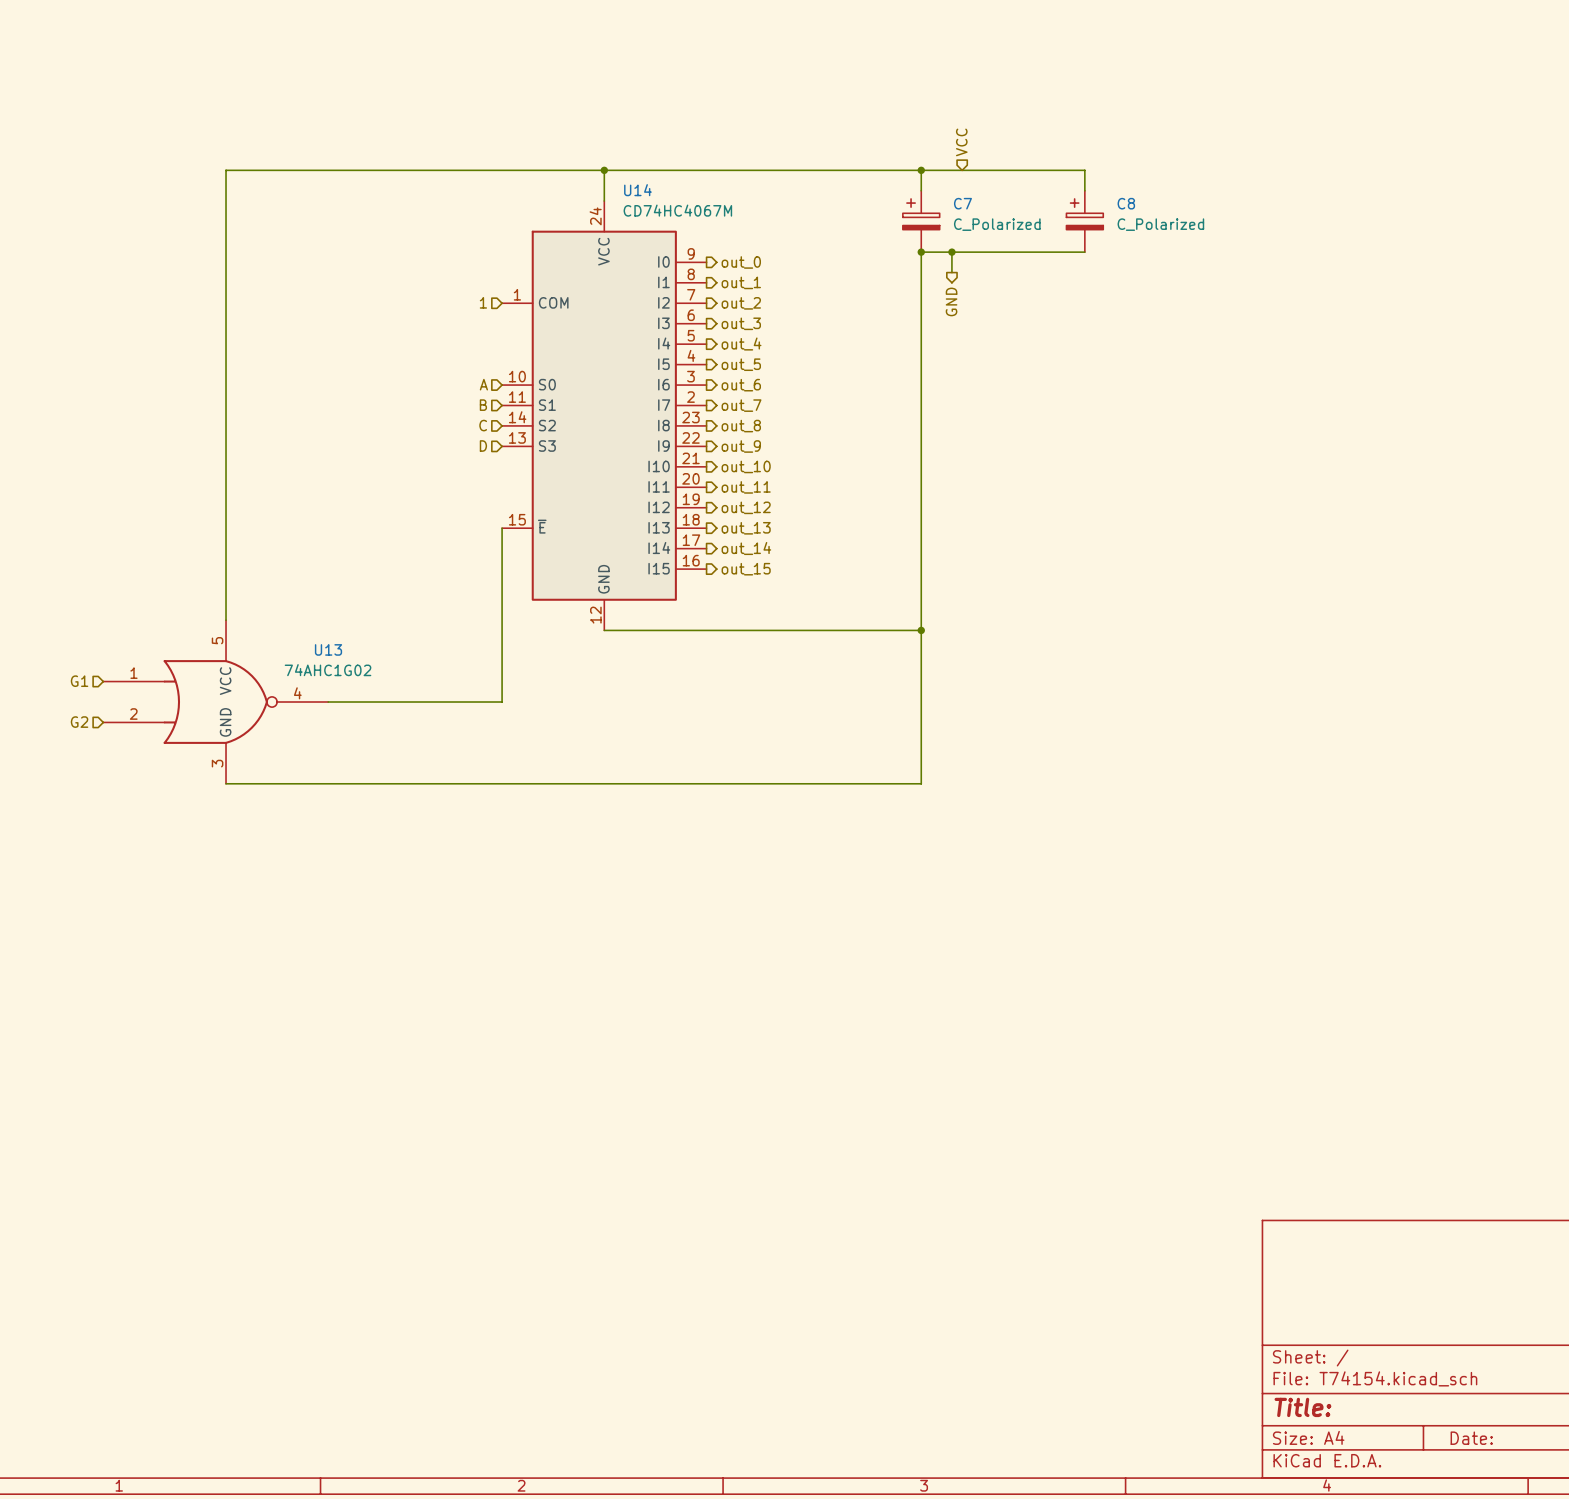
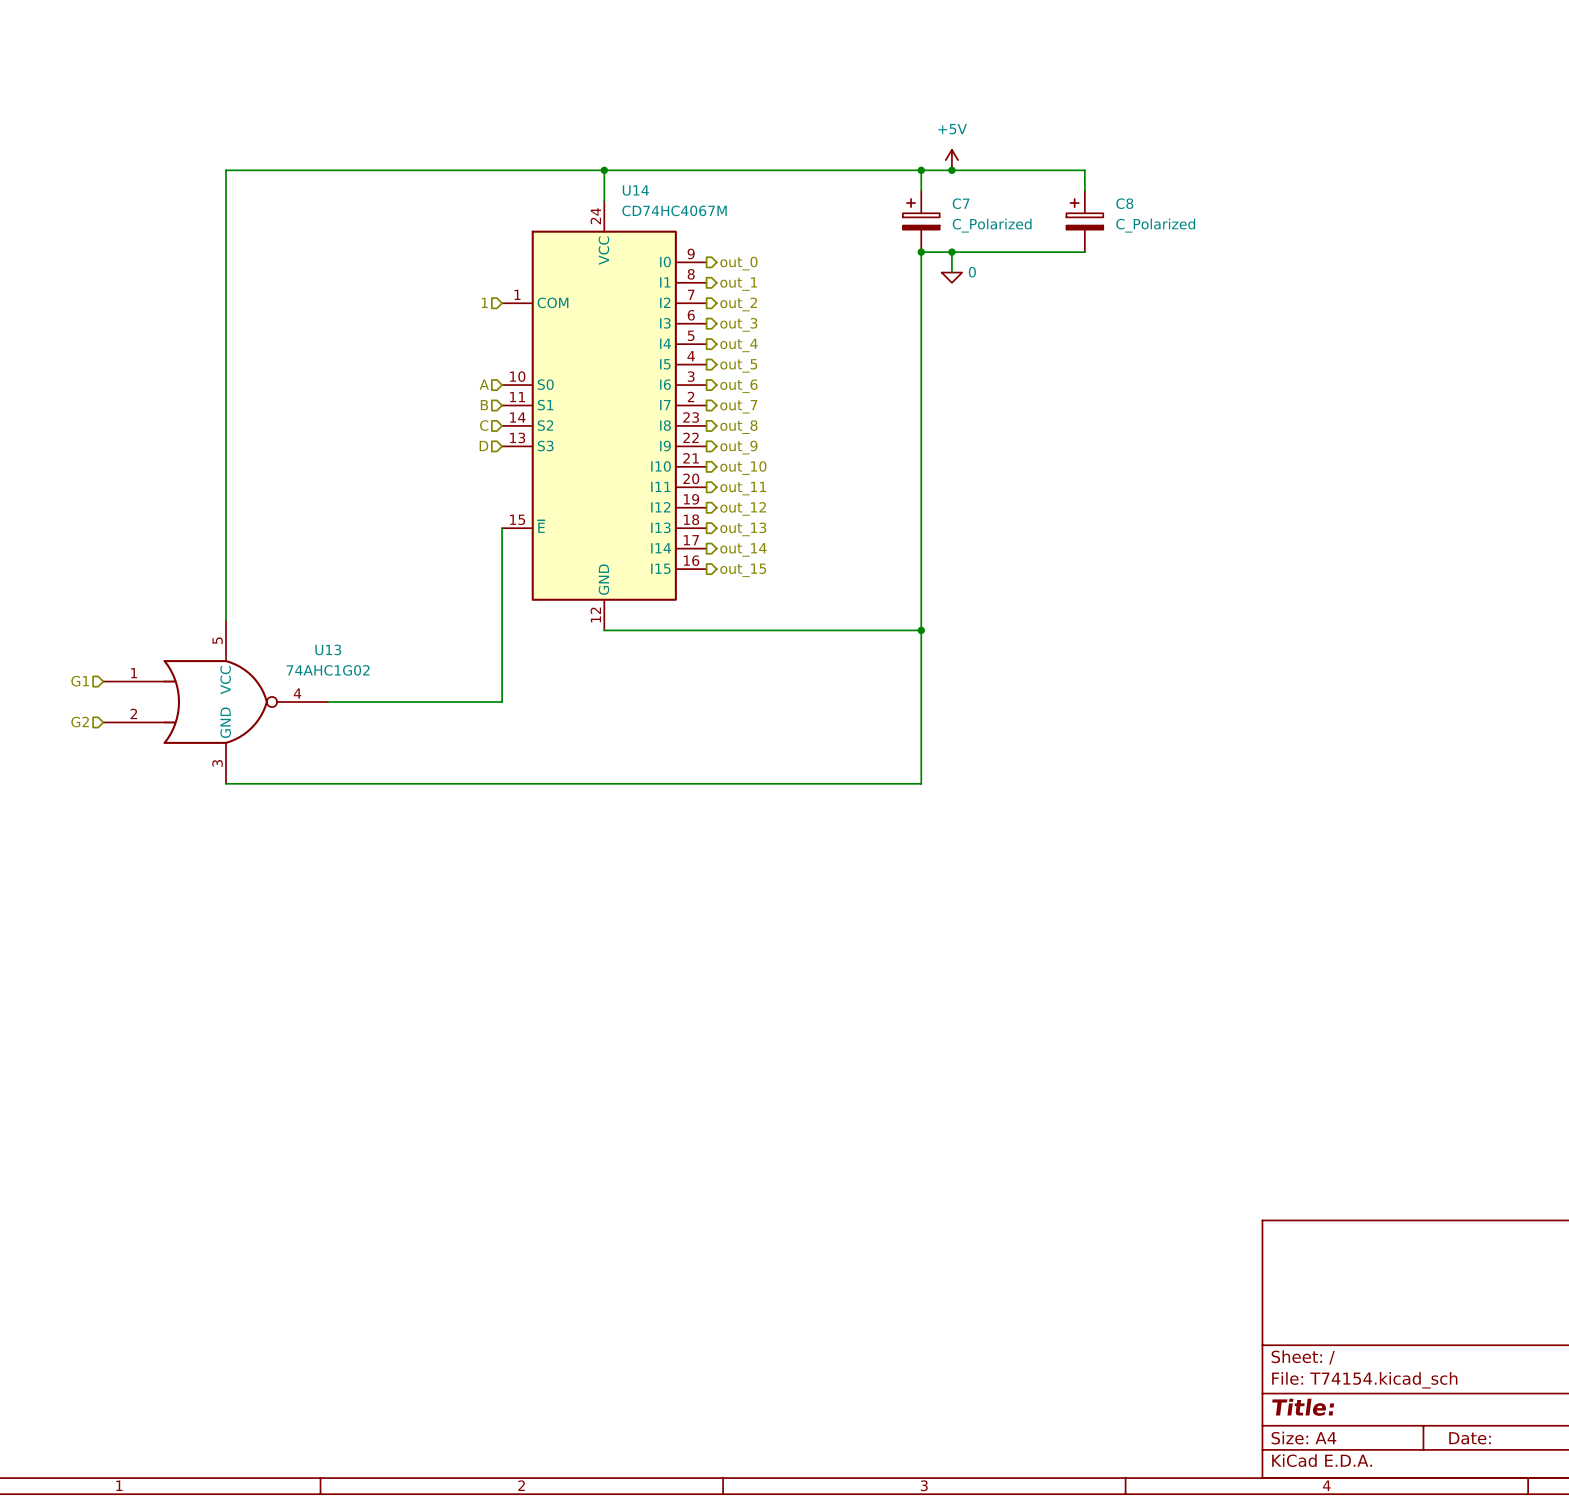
hierarchical label: VCC (961, 142) -> none
power symbol: none -> +5V (951, 160)
junction: none -> (951, 170)
power symbol: none -> 0 (951, 277)
hierarchical label: GND (951, 301) -> none

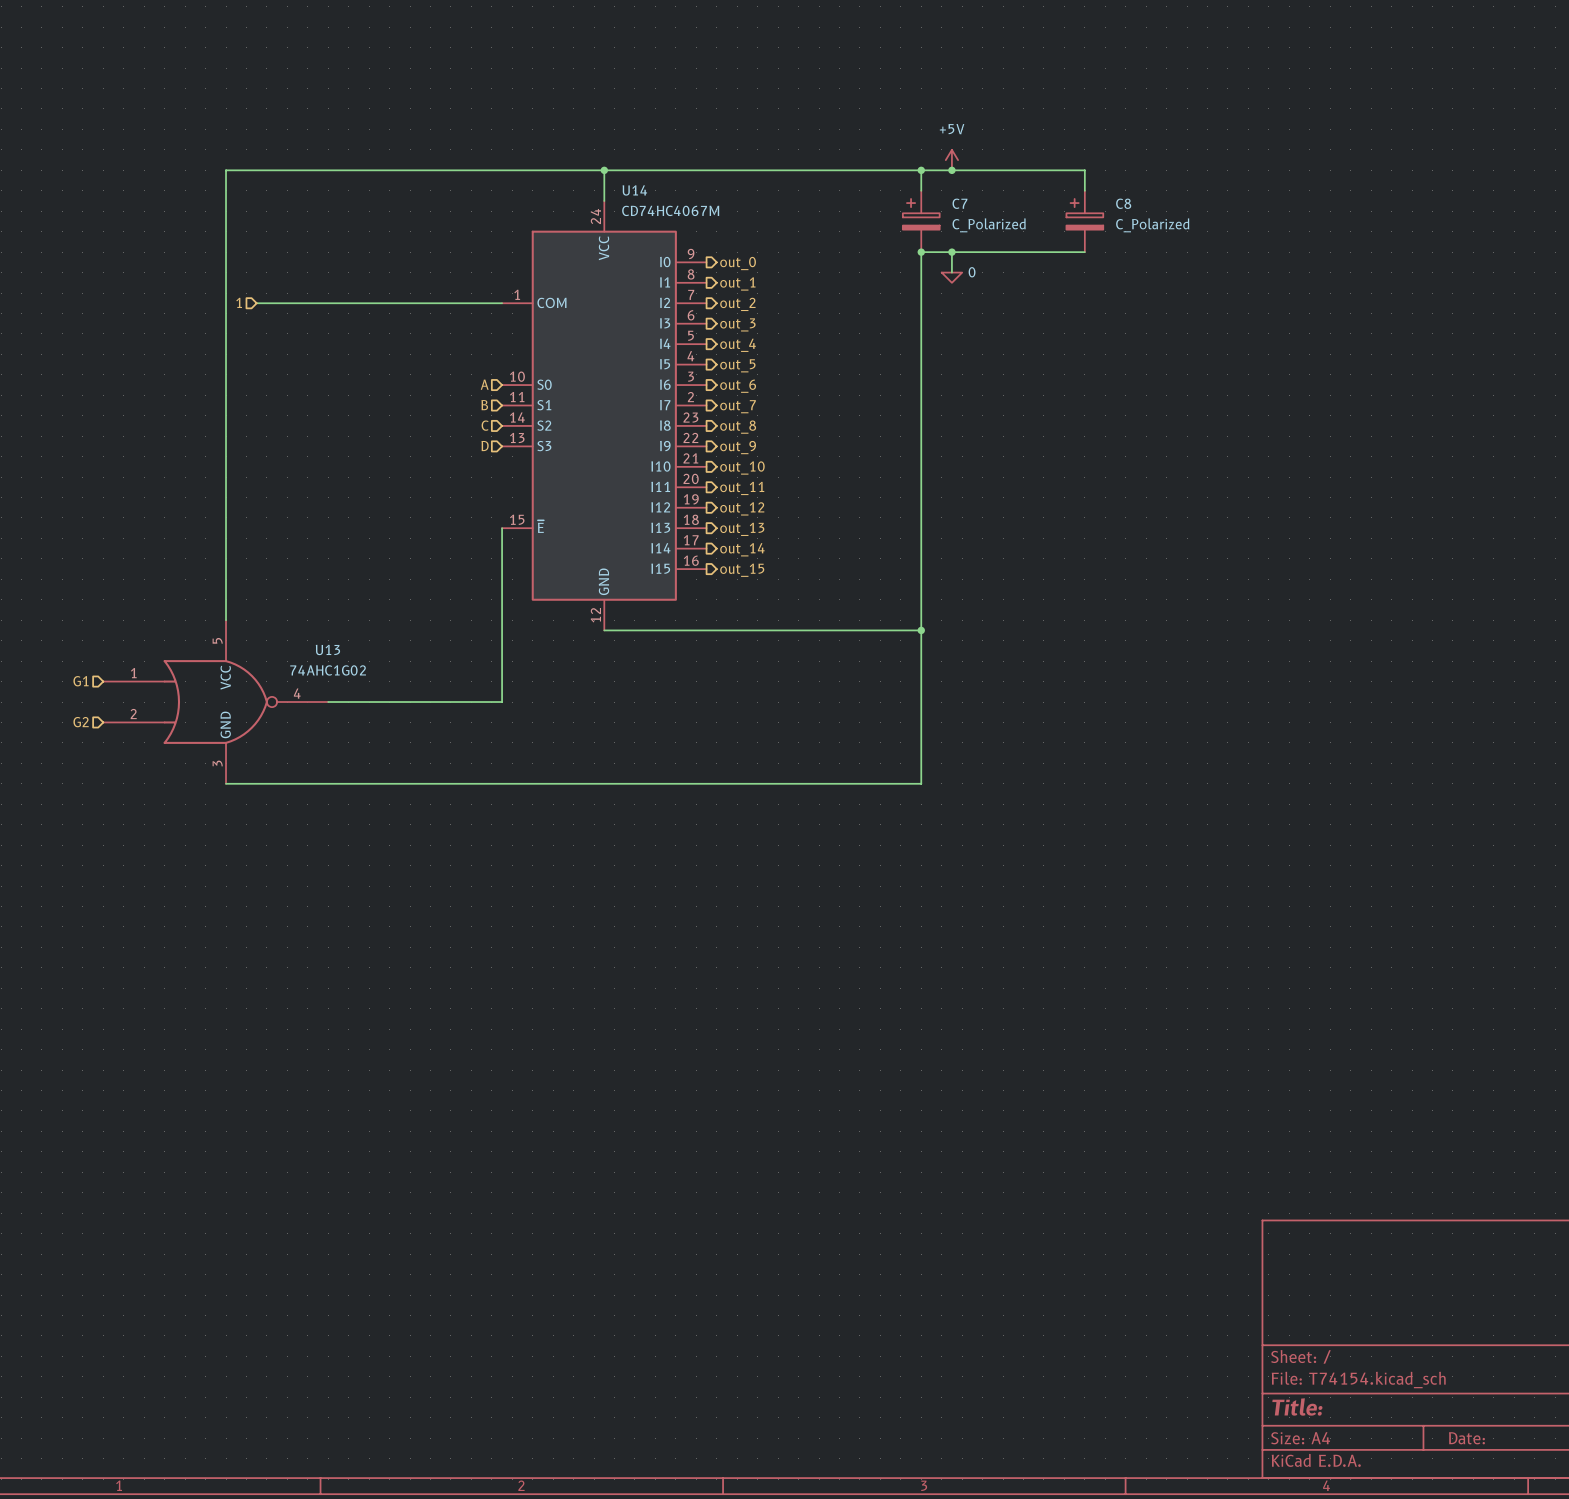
hierarchical label: none -> 1 (239, 302)
hierarchical label: 1 (484, 302) -> none
wire: none -> (256, 303) (502, 303)

